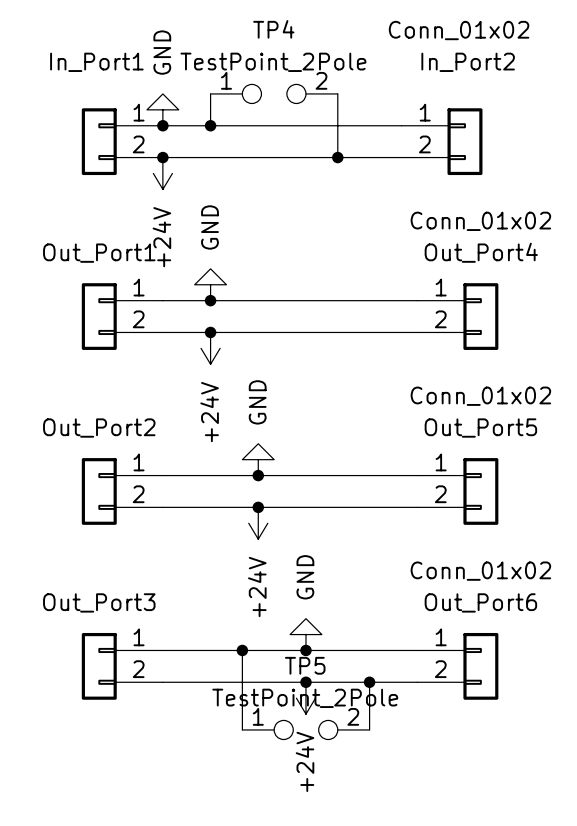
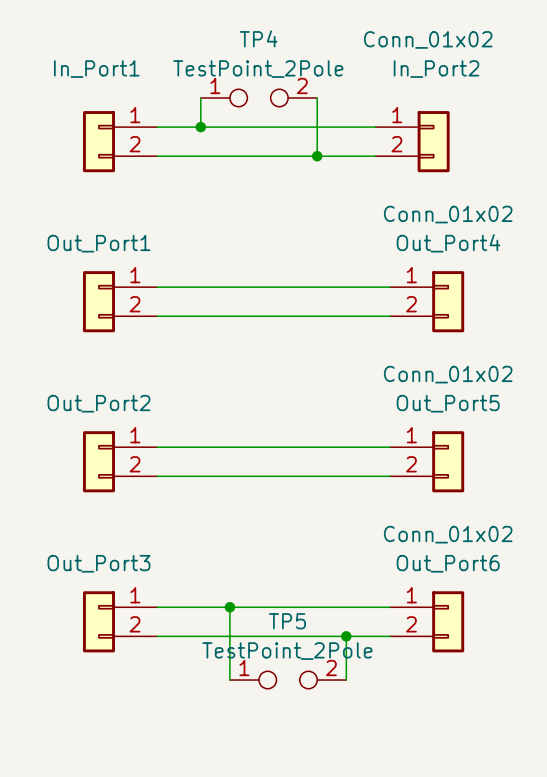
power symbol: GND (162, 109) -> none
junction: (162, 125) -> none
junction: (162, 157) -> none
power symbol: +24V (162, 173) -> none
power symbol: GND (210, 284) -> none
junction: (210, 300) -> none
junction: (210, 332) -> none
power symbol: +24V (210, 348) -> none
power symbol: GND (258, 459) -> none
junction: (258, 475) -> none
junction: (258, 507) -> none
power symbol: +24V (258, 523) -> none
power symbol: GND (305, 634) -> none
junction: (305, 650) -> none
junction: (305, 682) -> none
power symbol: +24V (305, 698) -> none

